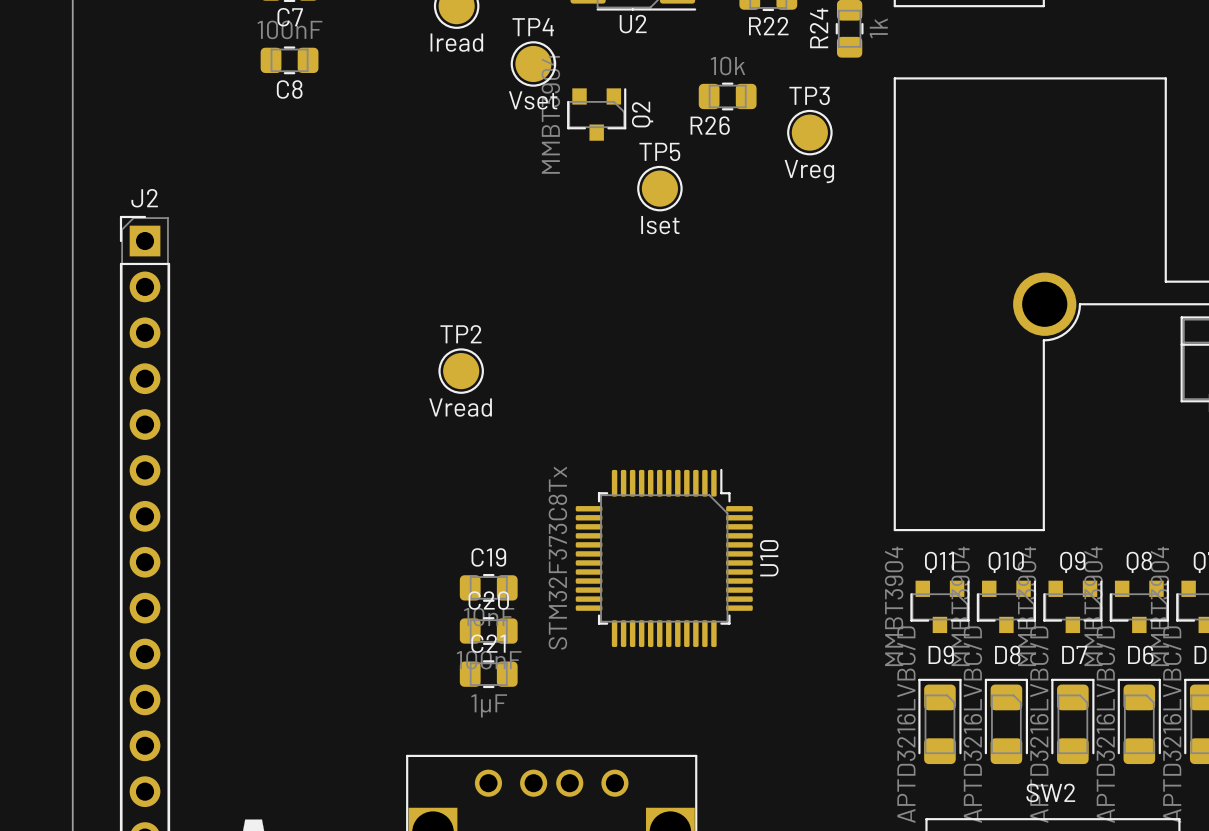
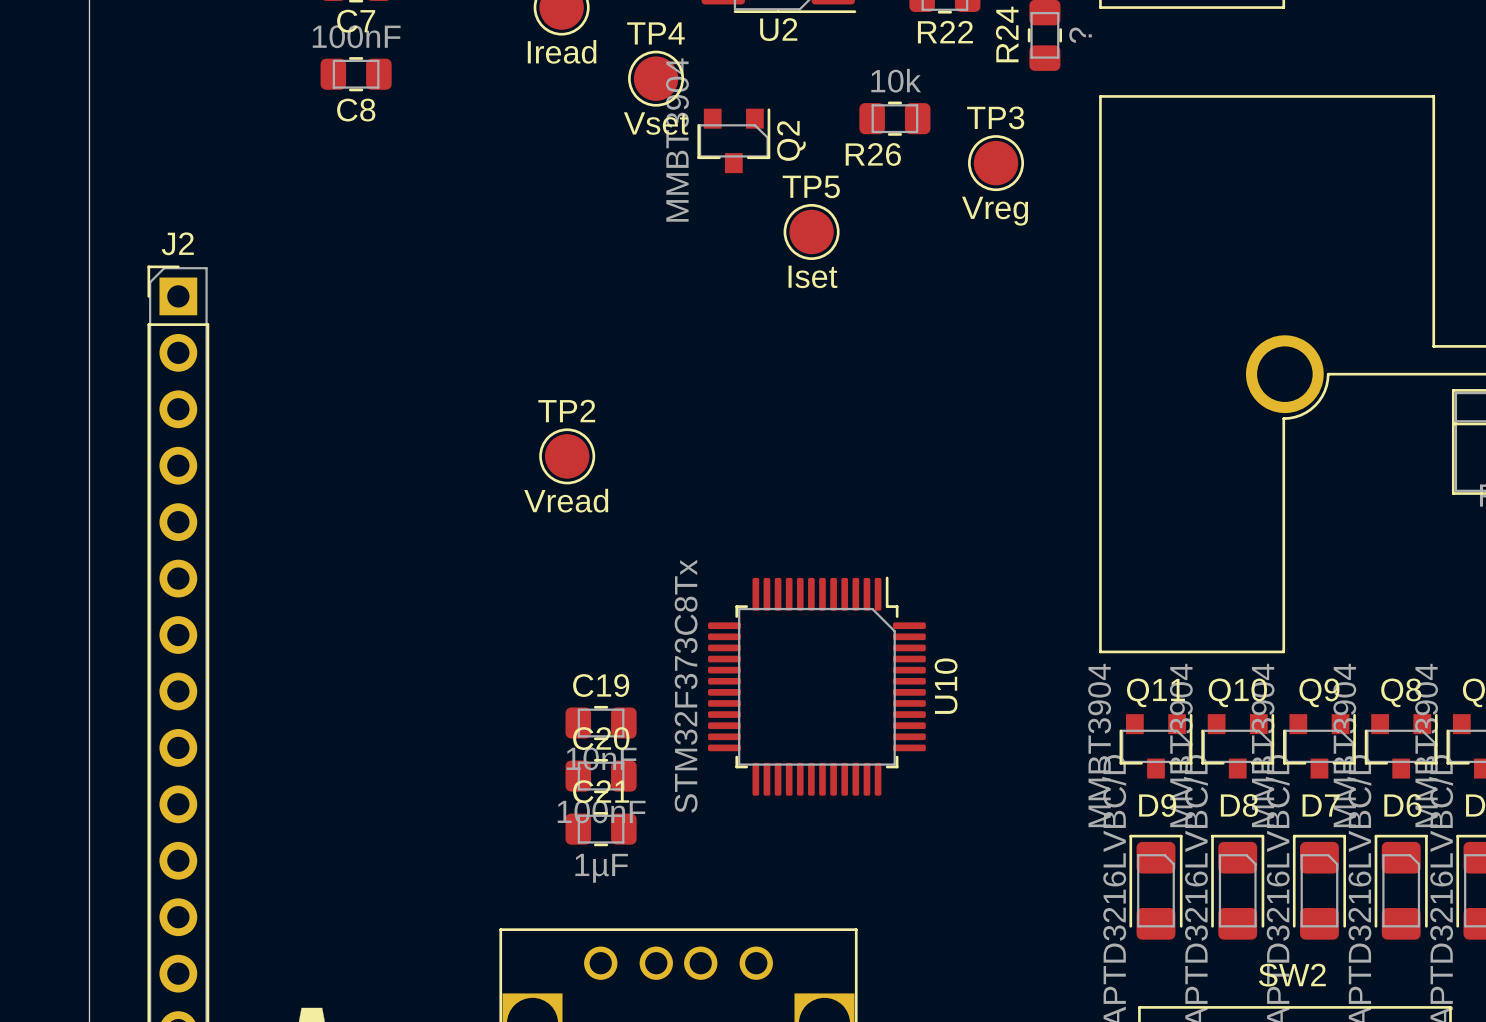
R24 value: 1k (878, 28) -> ? (1080, 35)

